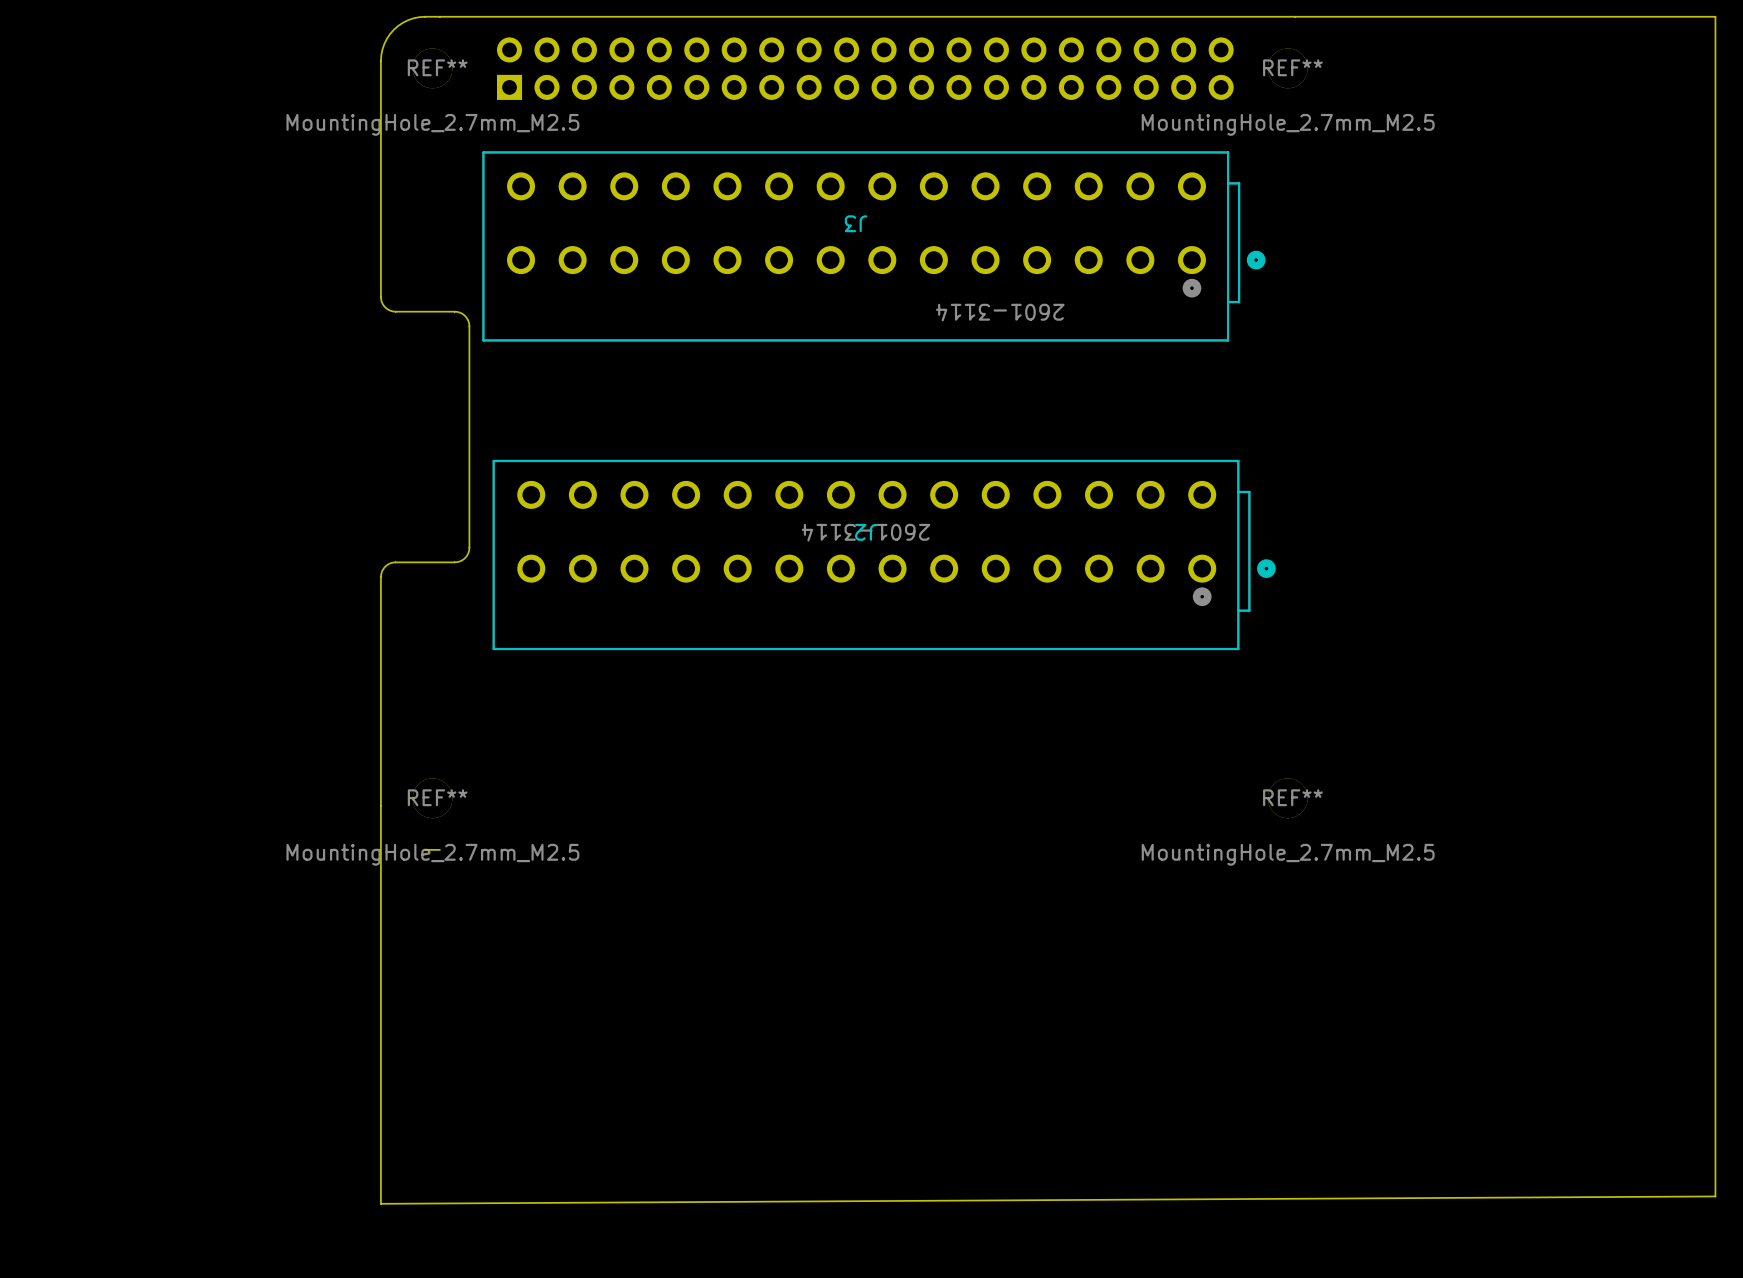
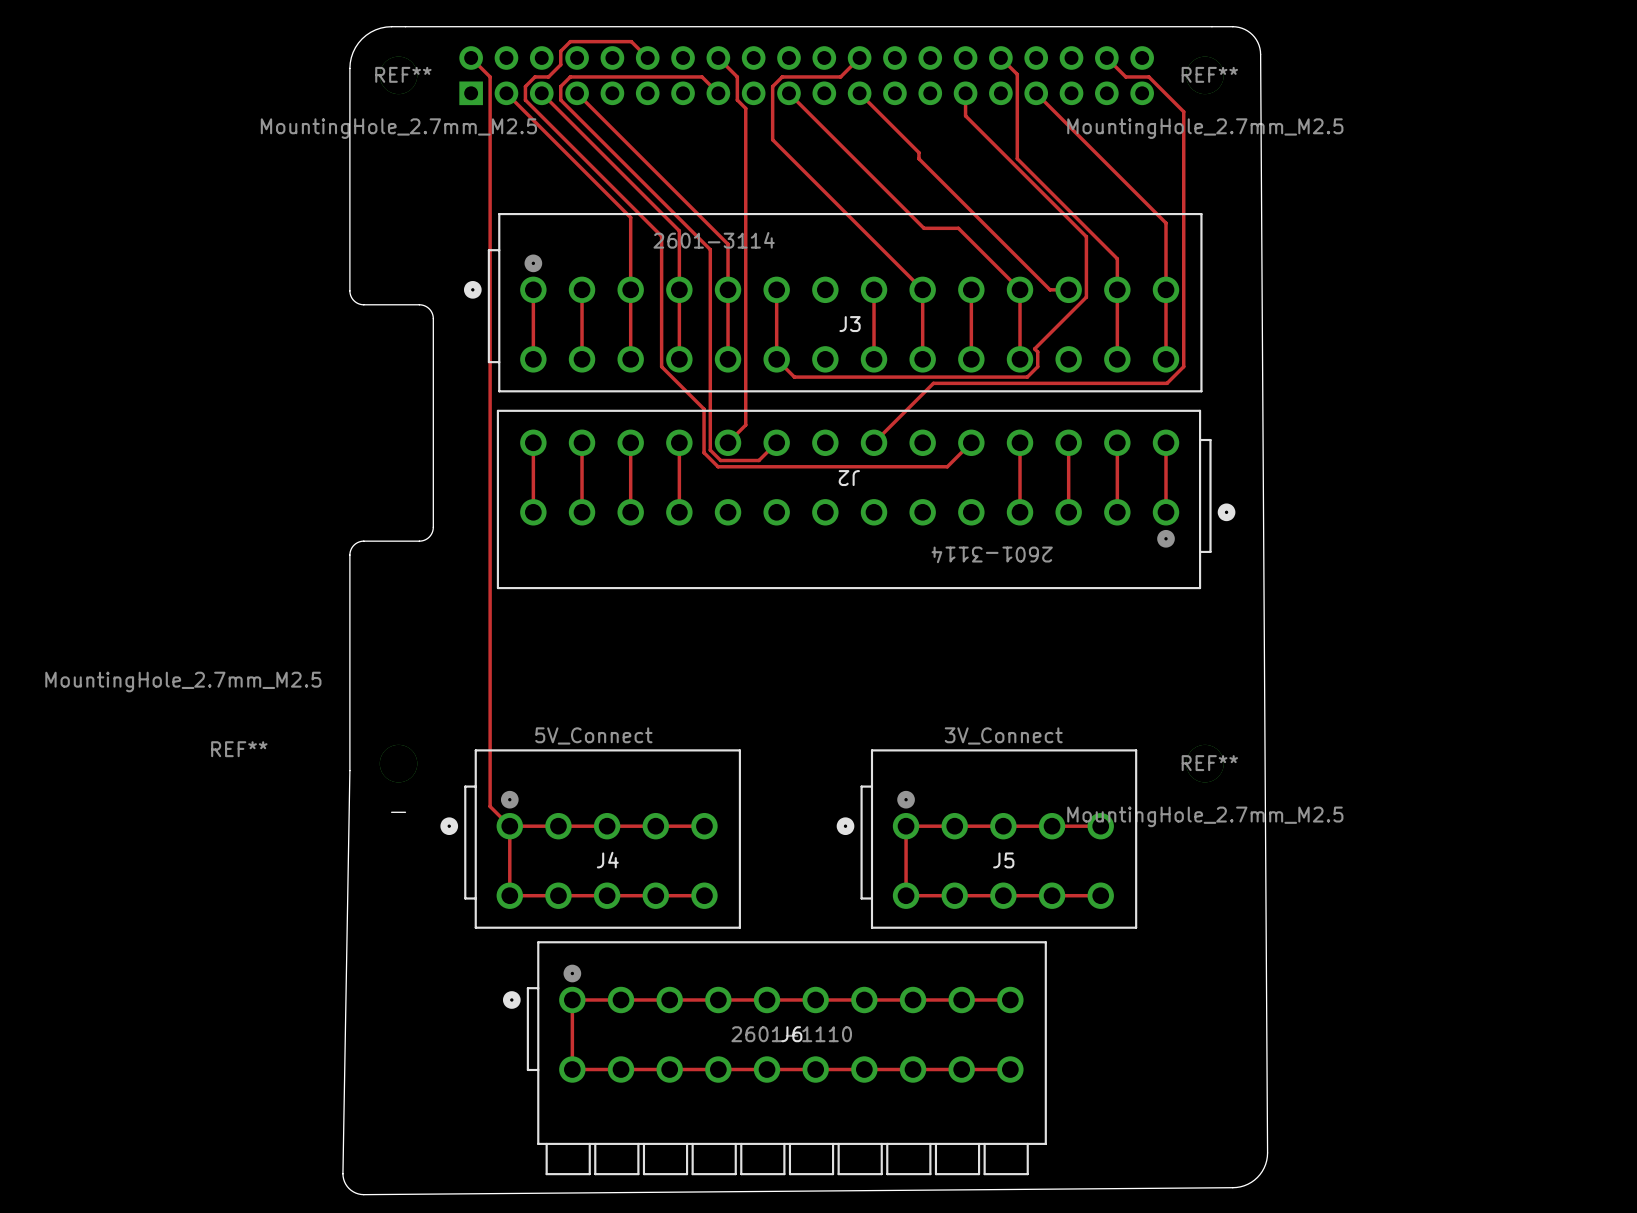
board edge: (1317, 16) (1715, 16) (1715, 1196) (380, 1203) (380, 805) -> (1232, 26) (1244, 29) (1252, 34) (1259, 45) (1260, 54) (1267, 1152) (1264, 1168) (1254, 1180) (1244, 1185) (1232, 1187) (363, 1194) (355, 1193) (345, 1184) (342, 1173) (349, 770)
track: none -> (471, 57) (490, 76) (490, 806) (509, 826)
track: none -> (647, 57) (631, 41) (570, 41) (560, 51) (560, 64) (548, 76) (535, 76) (525, 86) (525, 100) (661, 236) (661, 366) (704, 409) (704, 452) (718, 466) (947, 466) (971, 442)
track: none -> (718, 57) (737, 76) (737, 100) (745, 108) (745, 425) (728, 442)
track: none -> (859, 57) (840, 76) (782, 76) (772, 86) (772, 139) (922, 289) (922, 359)
track: none -> (1000, 57) (1017, 74) (1017, 158) (1117, 258) (1117, 359)
track: none -> (1106, 57) (1125, 76) (1148, 76) (1183, 111) (1183, 366) (1167, 383) (933, 383) (874, 442)
track: none -> (506, 93) (630, 217) (630, 359)
track: none -> (541, 93) (679, 230) (679, 359)
track: none -> (577, 93) (728, 244) (728, 359)
track: none -> (718, 93) (702, 76) (570, 76) (560, 86) (560, 100) (710, 249) (710, 450) (720, 460) (758, 460) (776, 442)
track: none -> (788, 93) (924, 228) (958, 228) (1020, 289) (1020, 359)
track: none -> (859, 93) (918, 152) (918, 158) (1049, 289) (1068, 289)
track: none -> (965, 93) (965, 115) (1086, 236) (1086, 297) (1034, 348) (1037, 352) (1037, 366) (1027, 377) (794, 377) (776, 359) (776, 289)
track: none -> (1036, 93) (1166, 223) (1166, 359)
J3 rotation: 0° (873, 246) -> 180° (833, 302)
track: none -> (533, 289) (533, 359)
track: none -> (582, 289) (582, 359)
track: none -> (874, 289) (874, 359)
track: none -> (971, 289) (971, 359)
track: none -> (533, 442) (533, 512)
track: none -> (582, 442) (582, 512)
track: none -> (630, 442) (630, 512)
track: none -> (679, 442) (679, 512)
track: none -> (1020, 442) (1020, 512)
track: none -> (1068, 442) (1068, 512)
track: none -> (1117, 442) (1117, 512)
track: none -> (1166, 442) (1166, 512)
J2 value position: 2601-3114 (866, 532) -> 2601-3114 (992, 554)
J2 position: (884, 554) -> (866, 499)
REF** name position: REF** (437, 797) -> REF** (239, 749)
REF** value position: MountingHole_2.7mm_M2.5 (432, 854) -> MountingHole_2.7mm_M2.5 (183, 681)
track: none -> (509, 826) (704, 826)
track: none -> (509, 826) (509, 895) (704, 895)
track: none -> (1100, 826) (906, 826) (906, 895) (1100, 895)
J4: none -> 5V_Connect (590, 839)
J5: none -> 3V_Connect (986, 839)
track: none -> (1010, 999) (572, 999) (572, 1069) (1010, 1069)
J6: none -> 2601-1110 (774, 1058)

